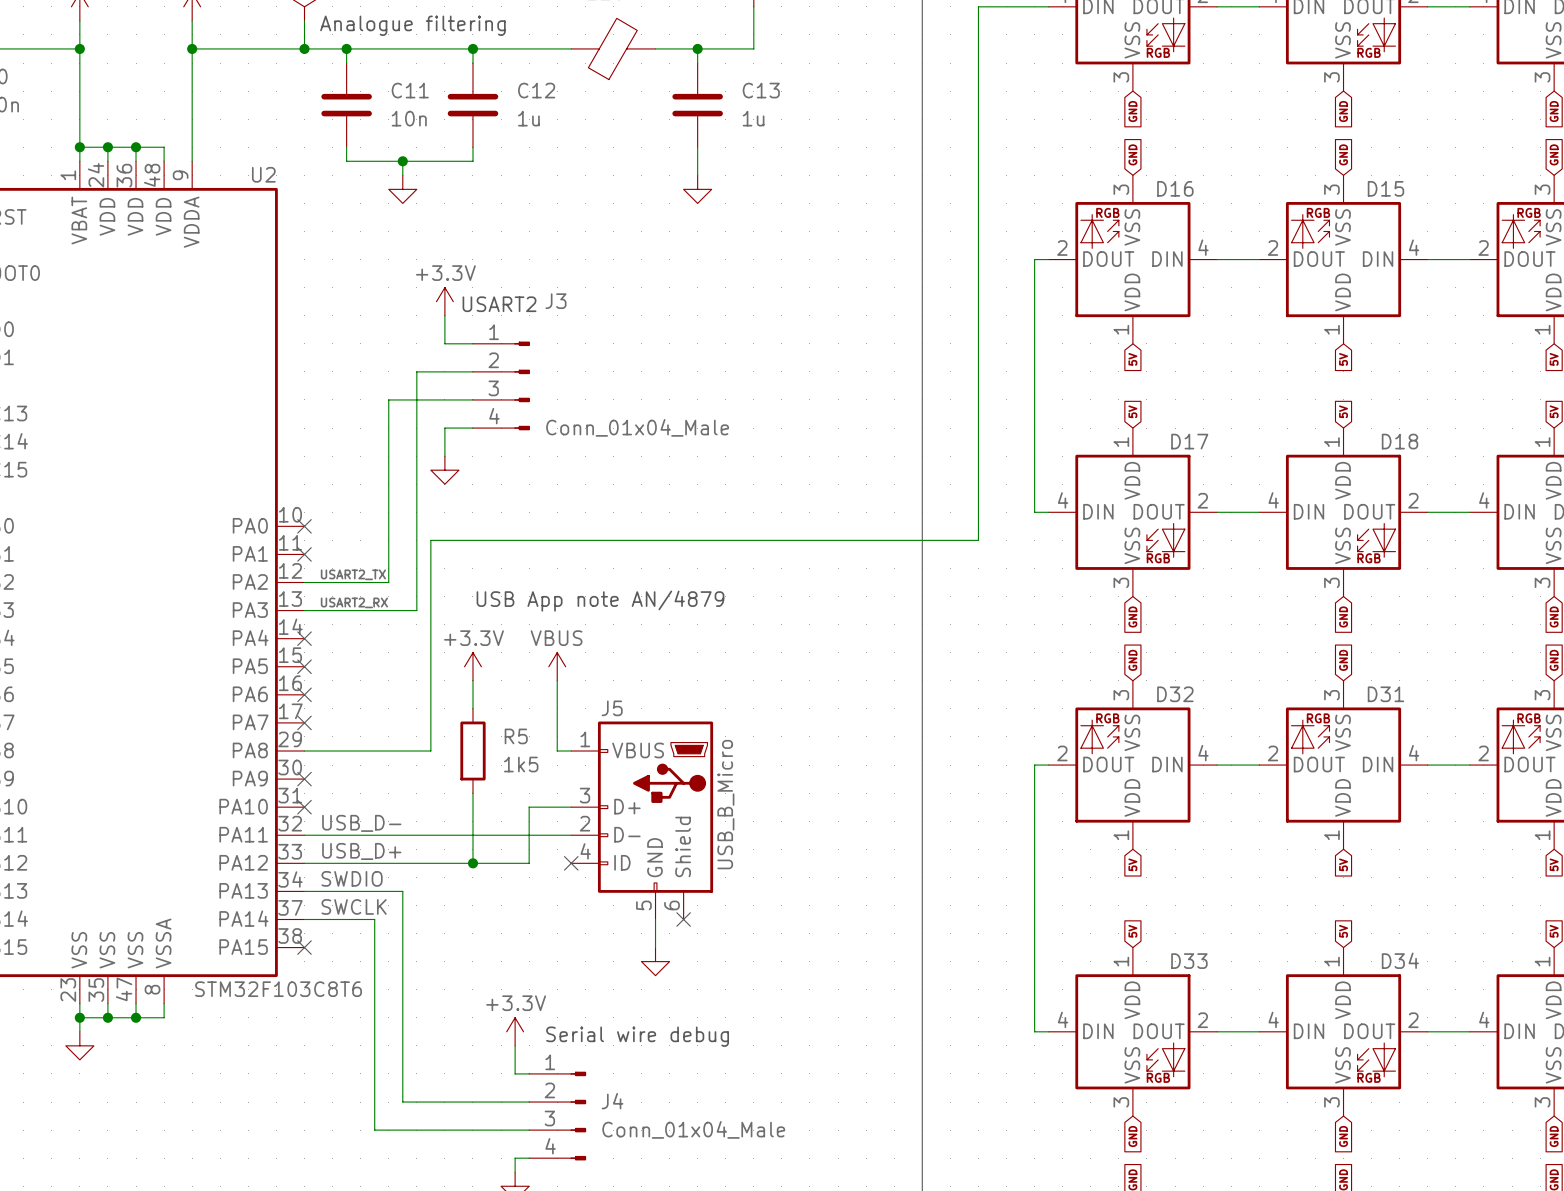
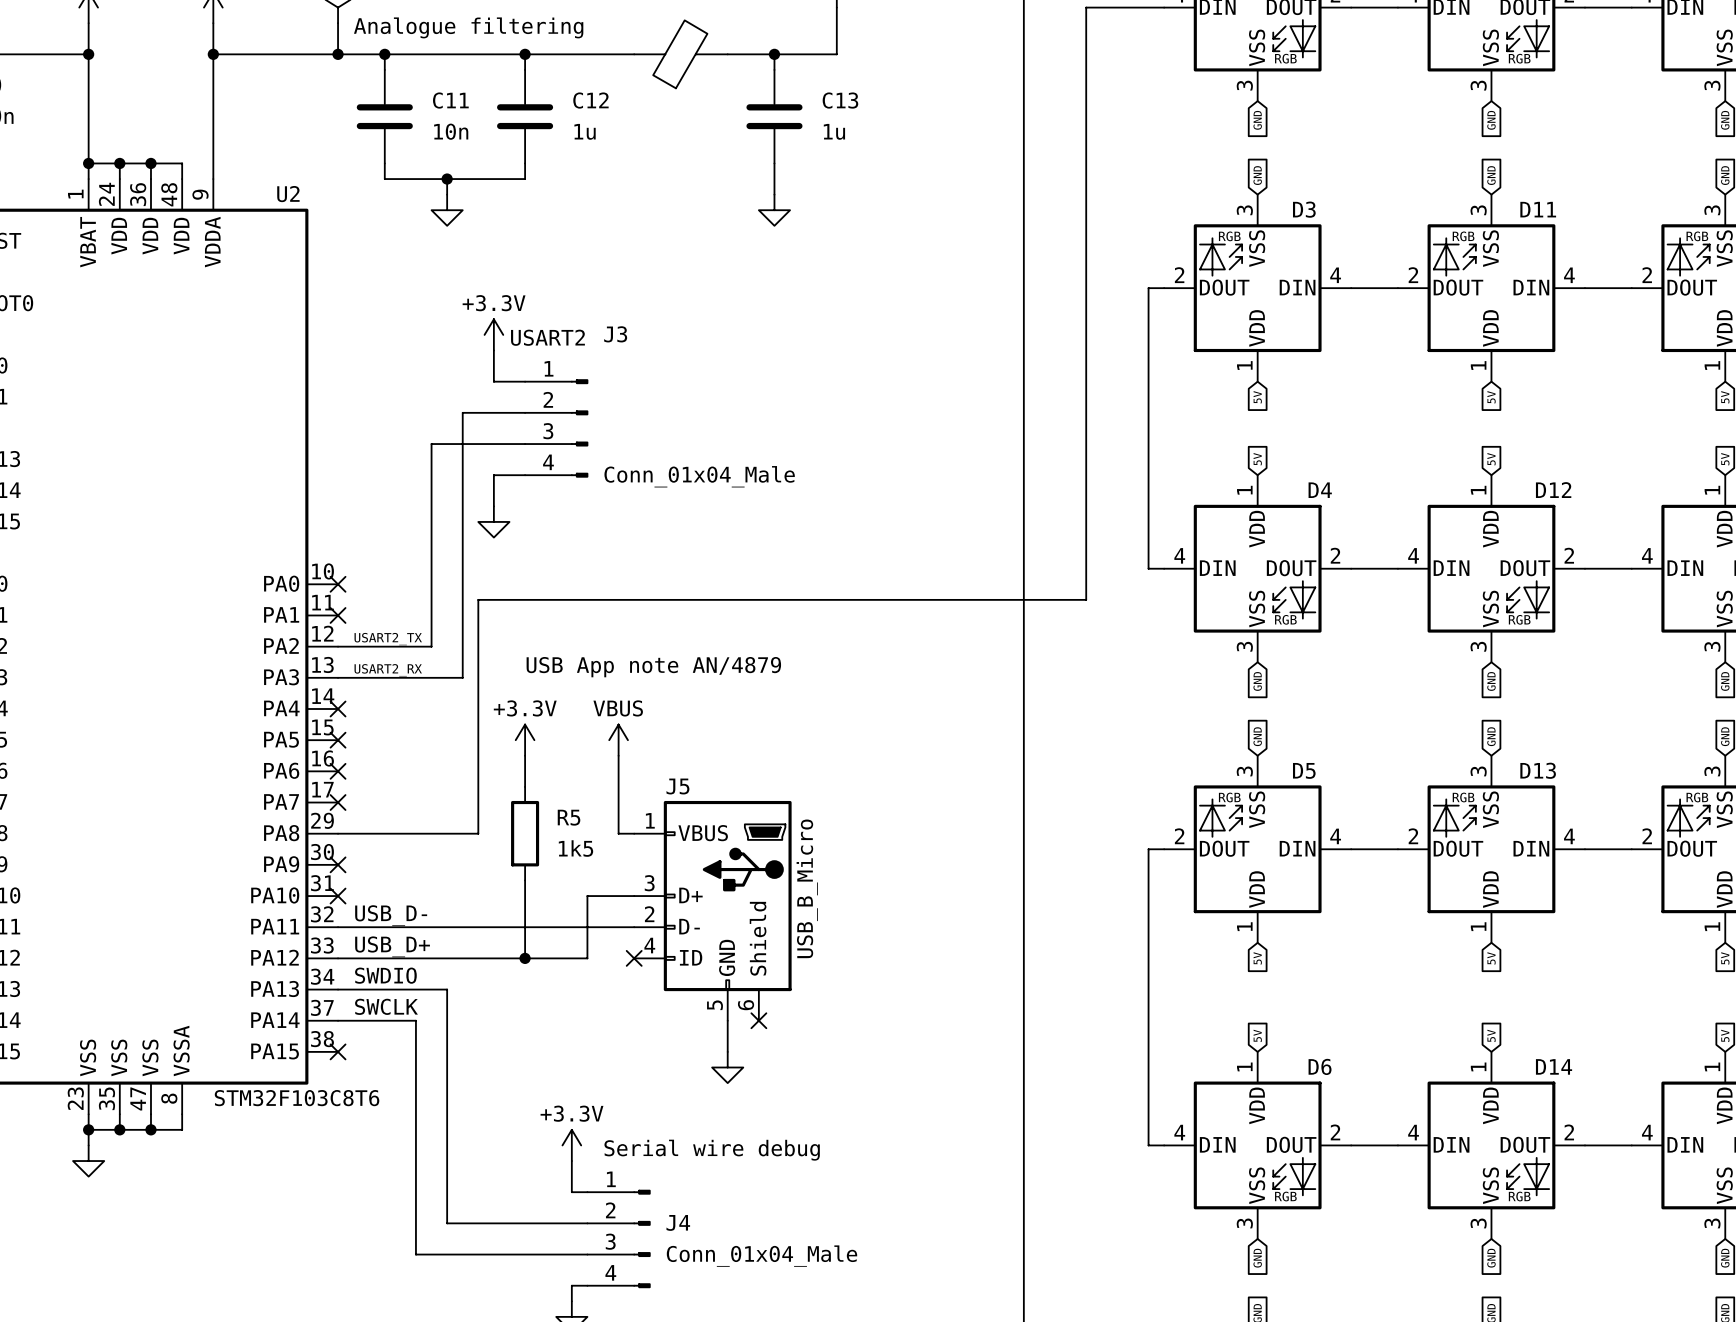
D16 name: D16 (1175, 188) -> D3 (1304, 209)
D15 name: D15 (1385, 188) -> D11 (1538, 209)
D17 name: D17 (1189, 441) -> D4 (1320, 490)
D18 name: D18 (1400, 441) -> D12 (1553, 490)
D32 name: D32 (1175, 694) -> D5 (1304, 770)
D31 name: D31 (1385, 694) -> D13 (1538, 770)
D34 name: D34 (1400, 960) -> D14 (1554, 1066)
D33 name: D33 (1189, 961) -> D6 (1320, 1066)

